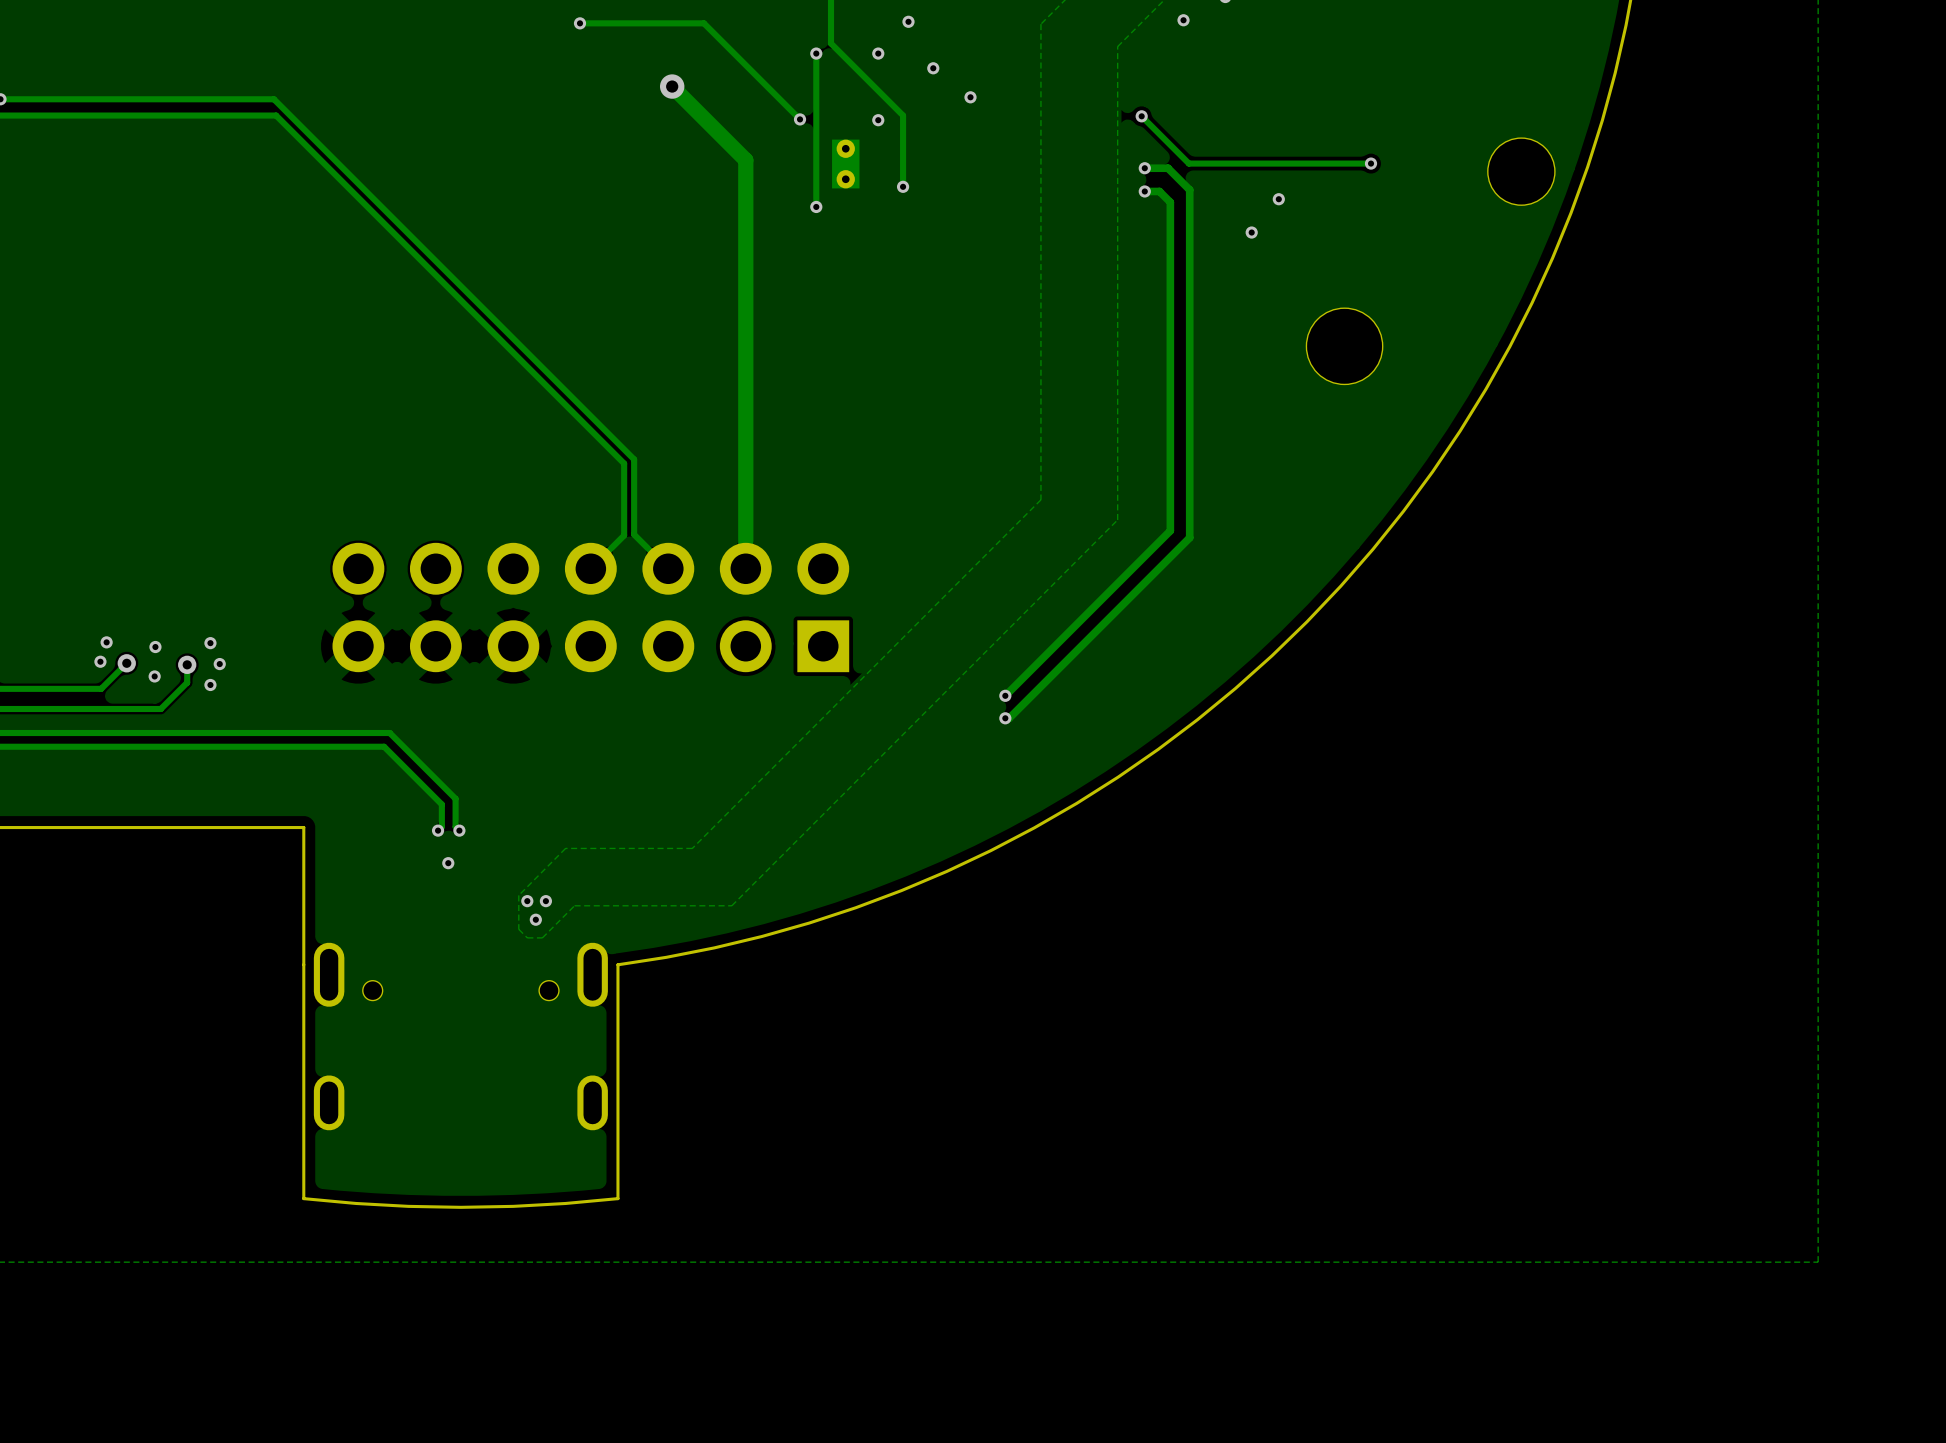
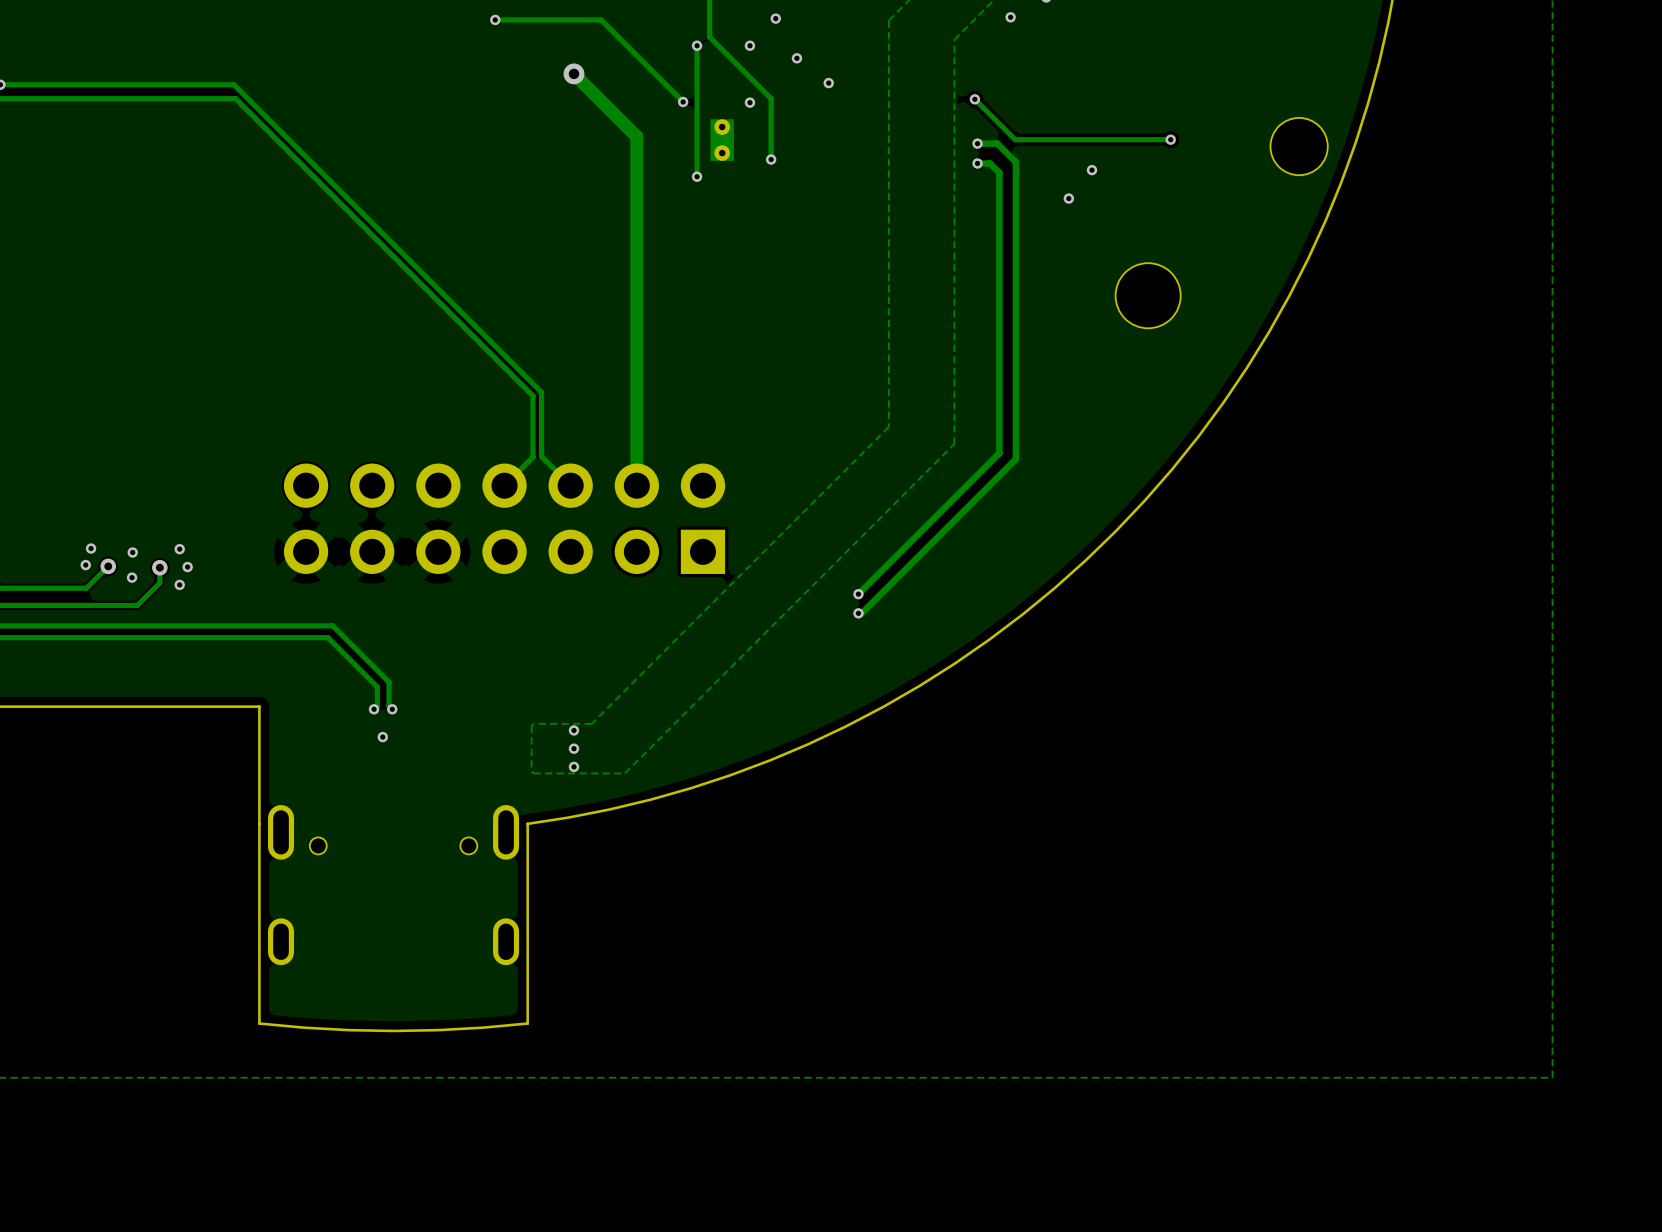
zone outline: (693, 847) (565, 848) (518, 895) (518, 929) (527, 937) (542, 937) (574, 905) (731, 905) -> (591, 723) (533, 723) (531, 725) (531, 771) (533, 773) (624, 773)
via: none -> (573, 730)
via: none -> (573, 748)
via: none -> (573, 766)
via: (527, 901) -> none
via: (545, 901) -> none
via: (535, 919) -> none

